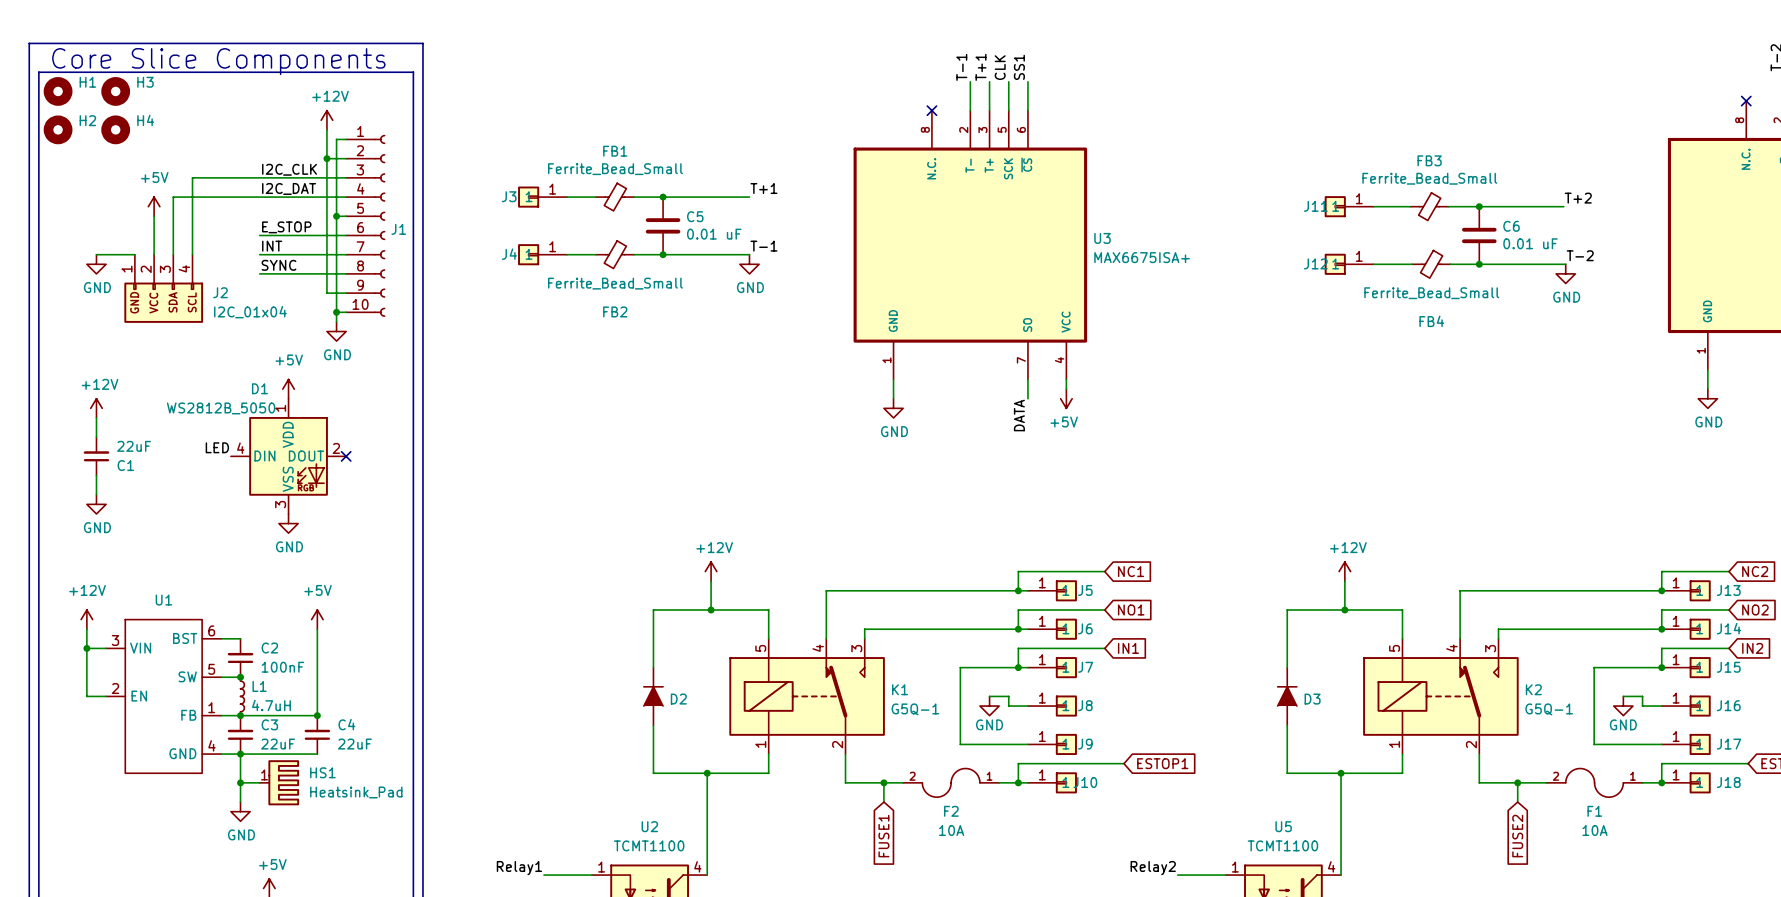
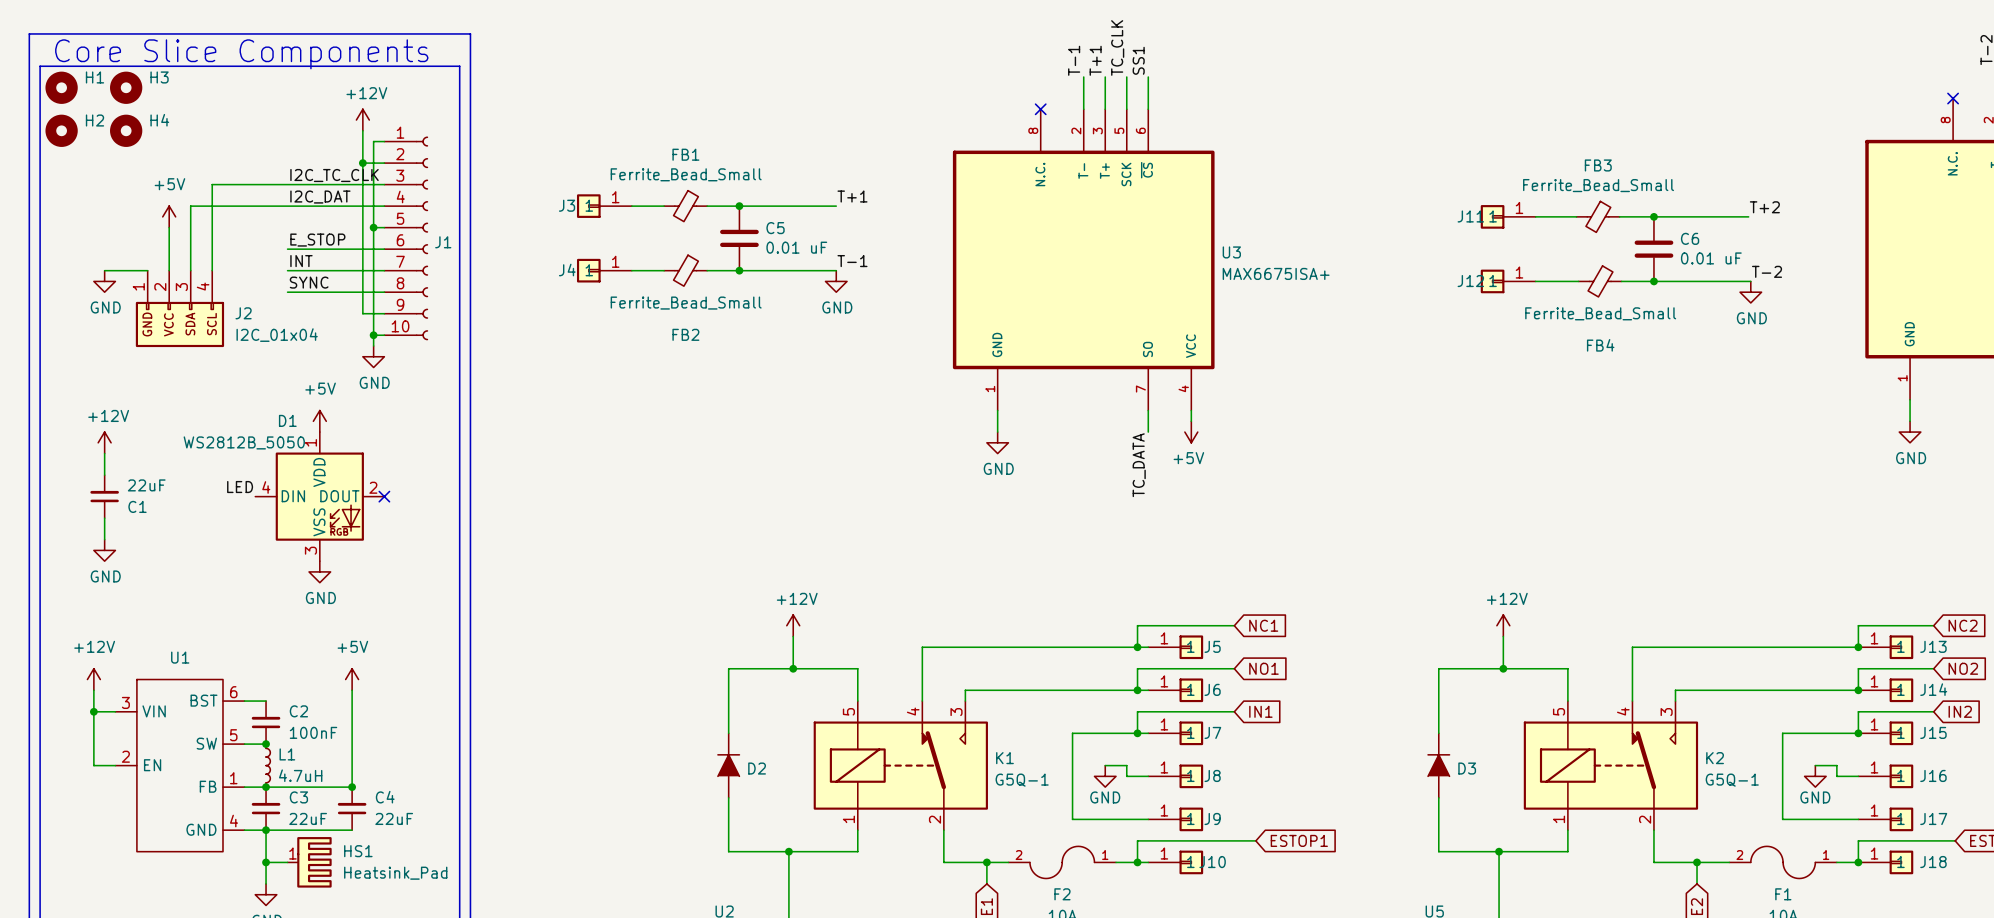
label: CLK (1000, 67) -> TC_CLK (1117, 47)
label: I2C_CLK (289, 169) -> I2C_TC_CLK (334, 175)
label: DATA (1019, 415) -> TC_DATA (1139, 465)

